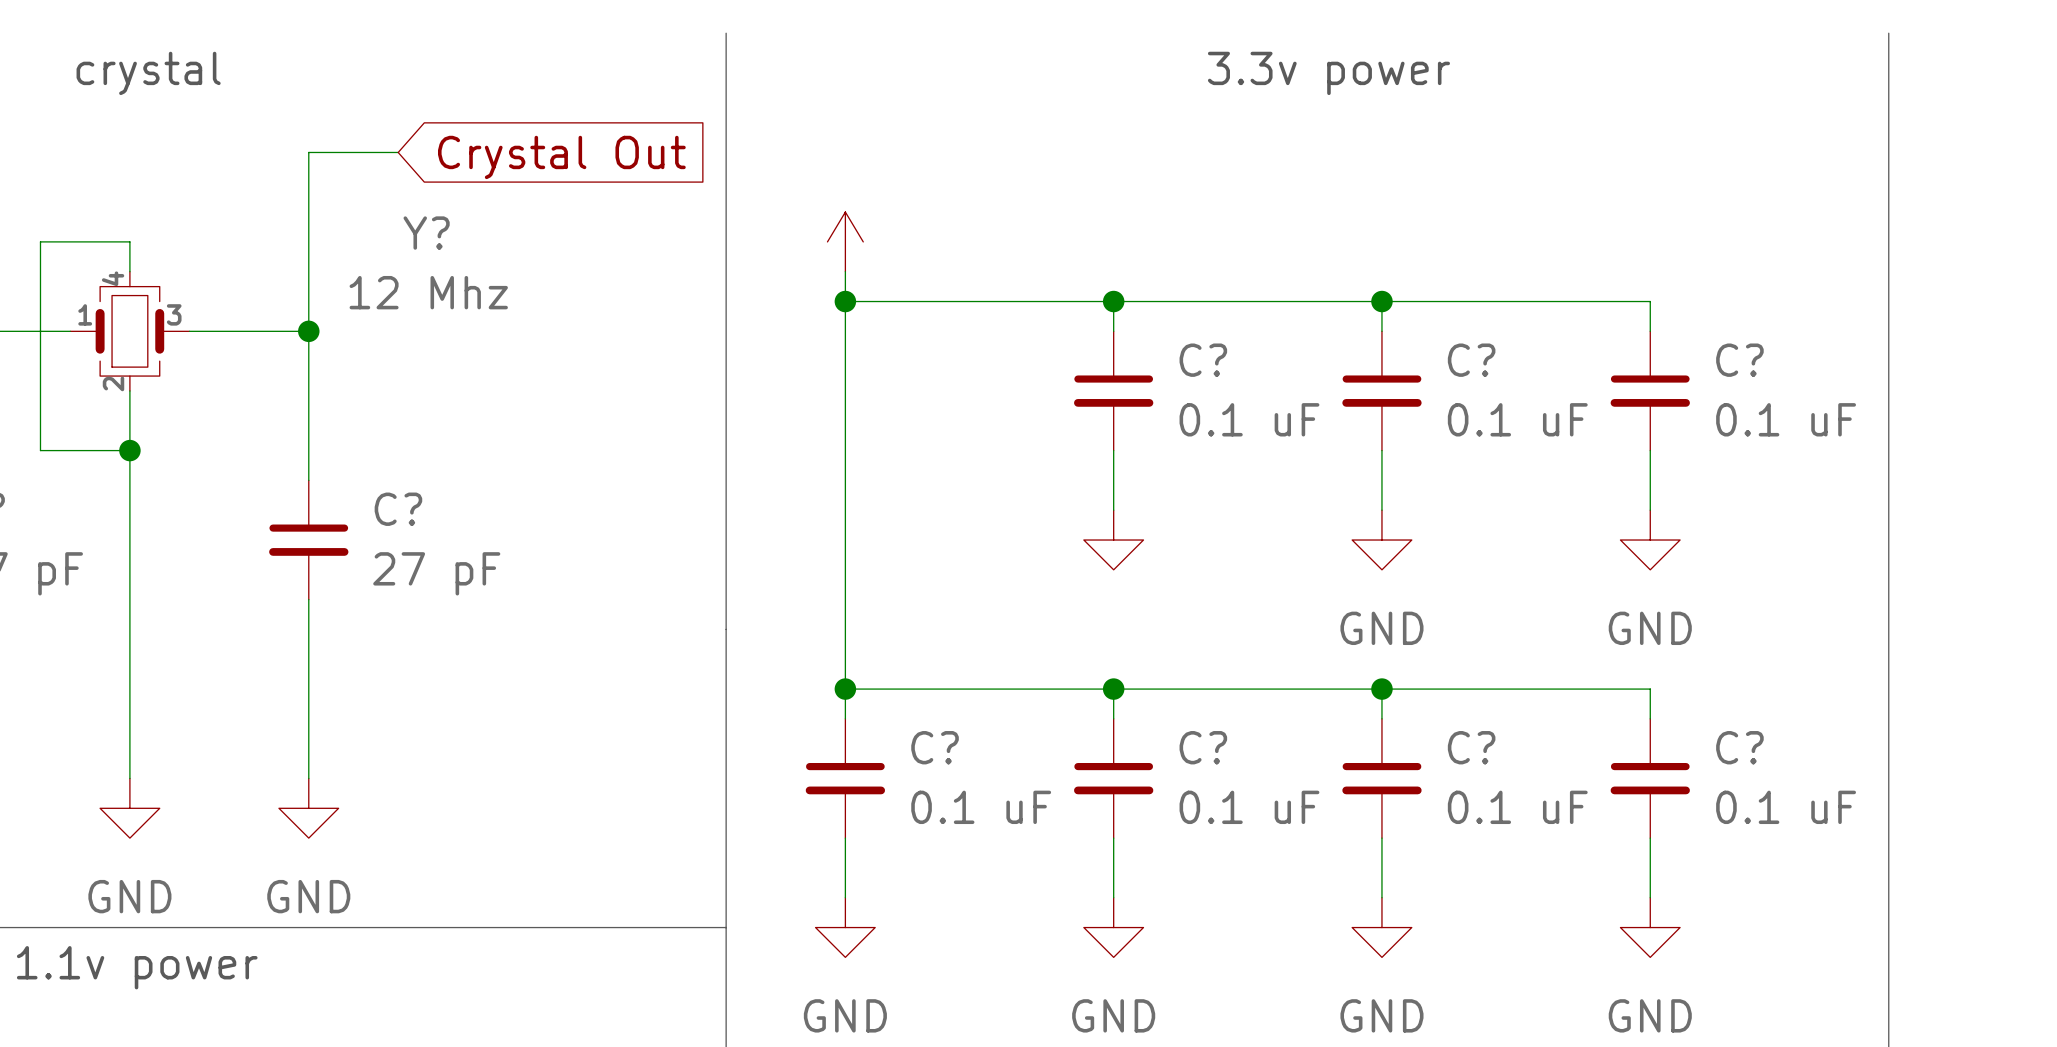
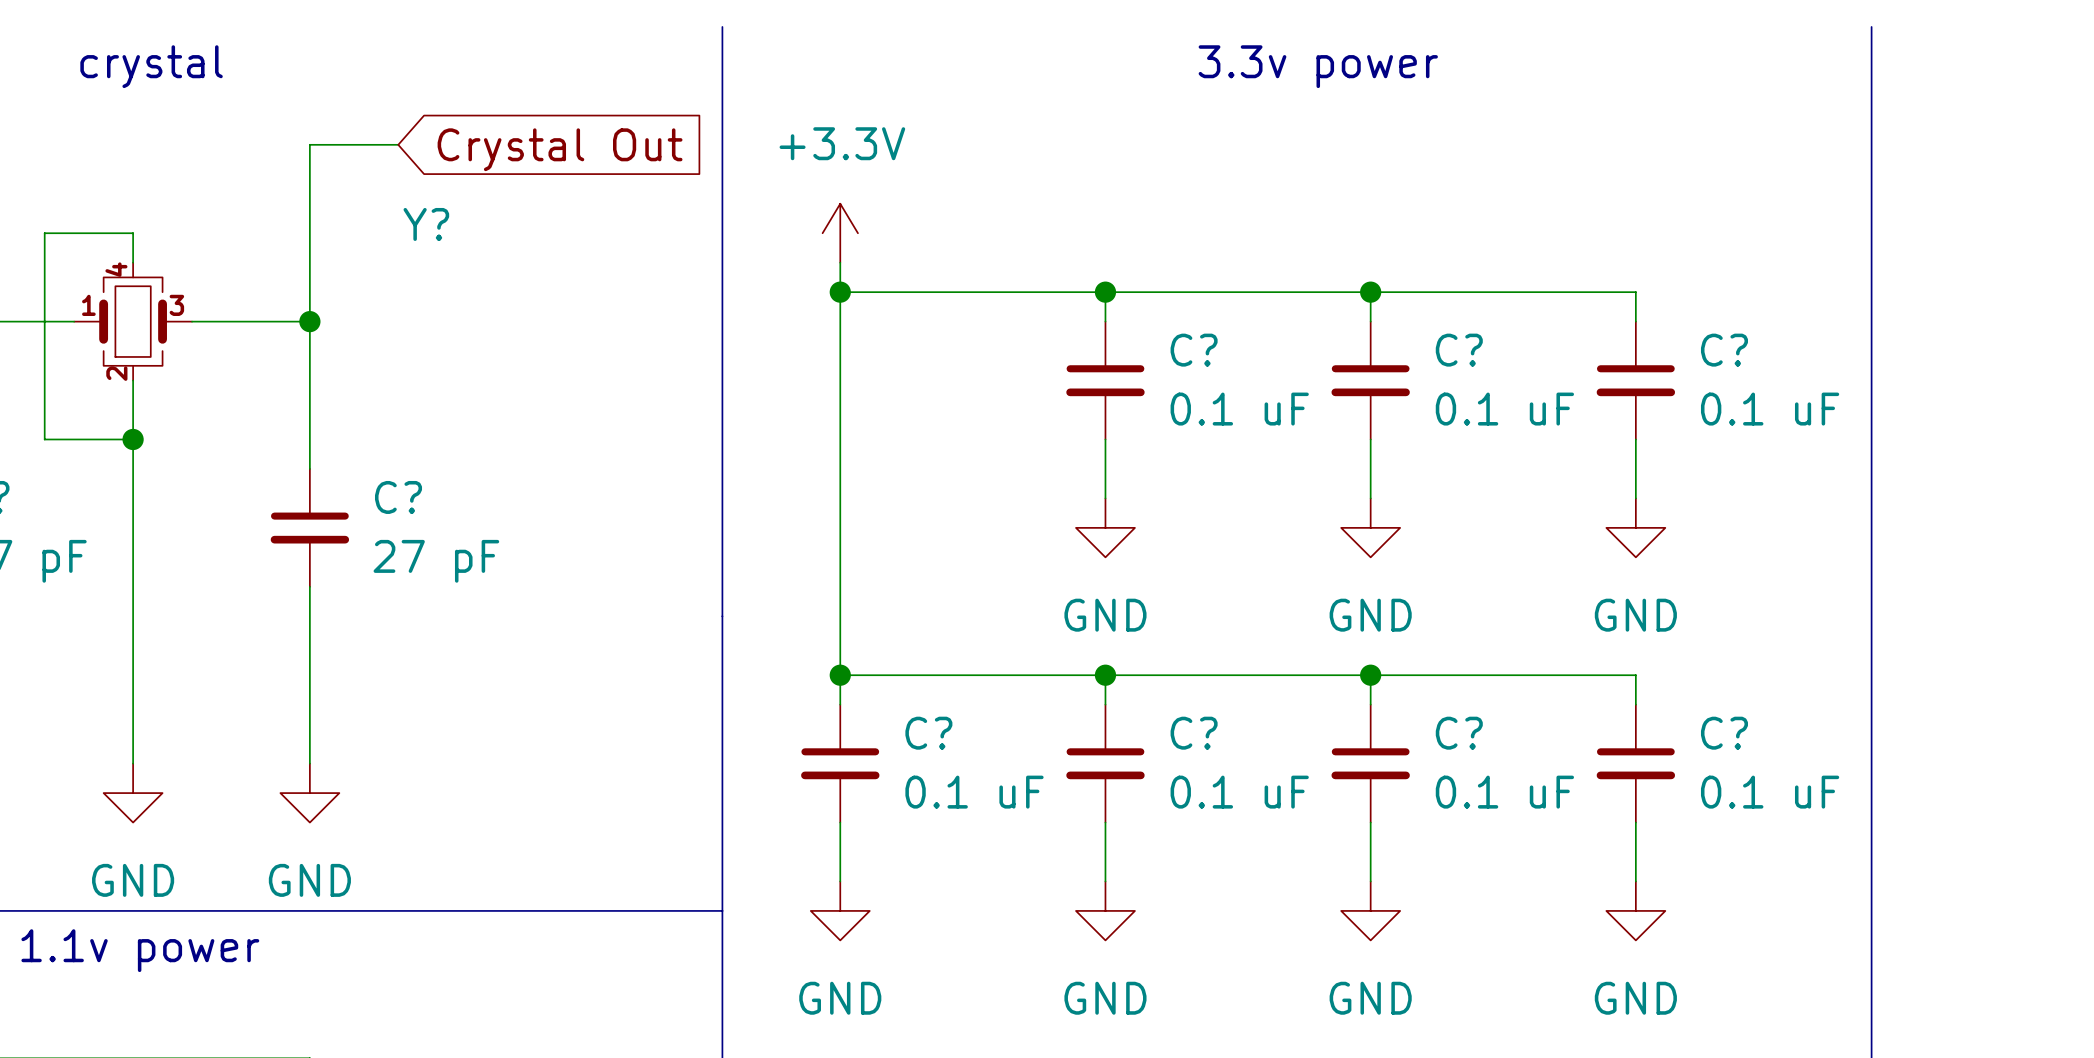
power symbol text: none -> +3.3V (842, 143)
Y? value: 12 Mhz (428, 292) -> none
power symbol text: none -> GND (1105, 615)

